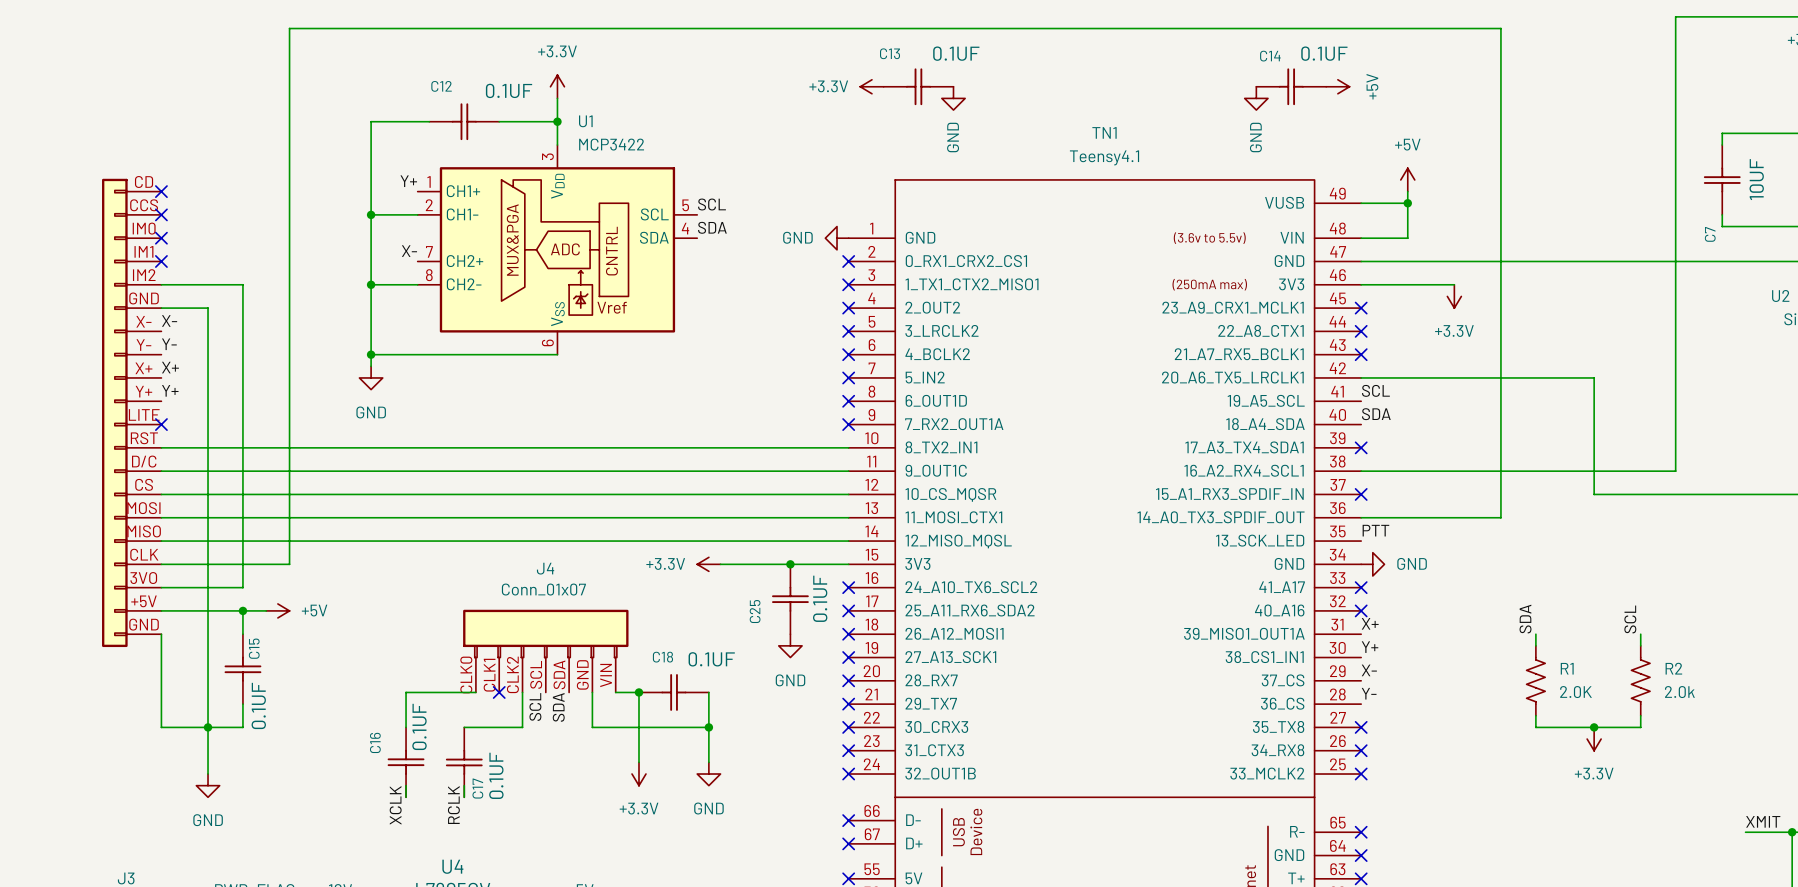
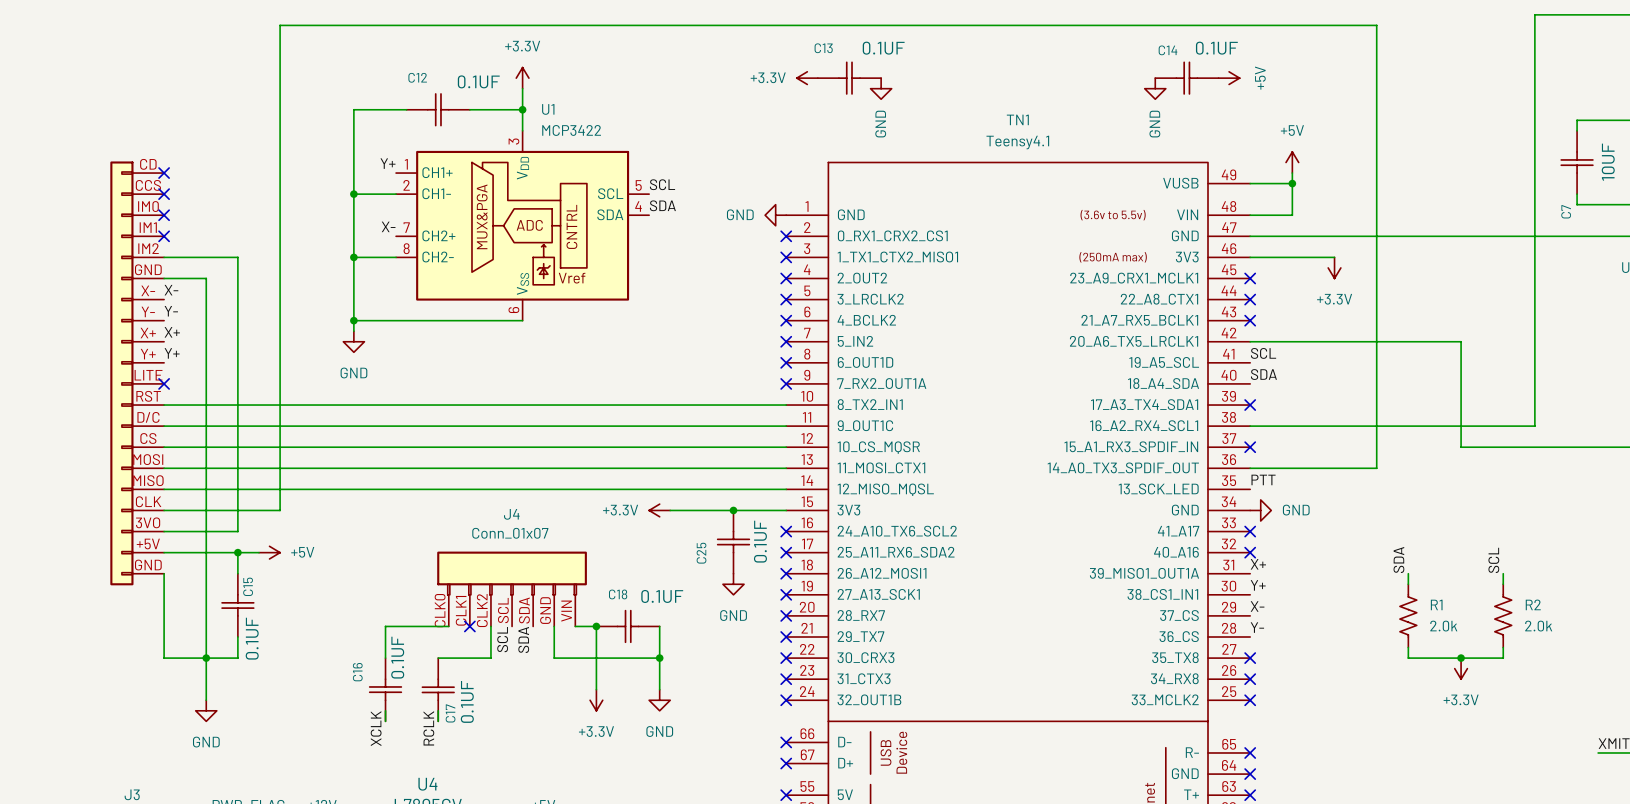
R1 value: 2.0K (1576, 692) -> 2.0k (1443, 626)

